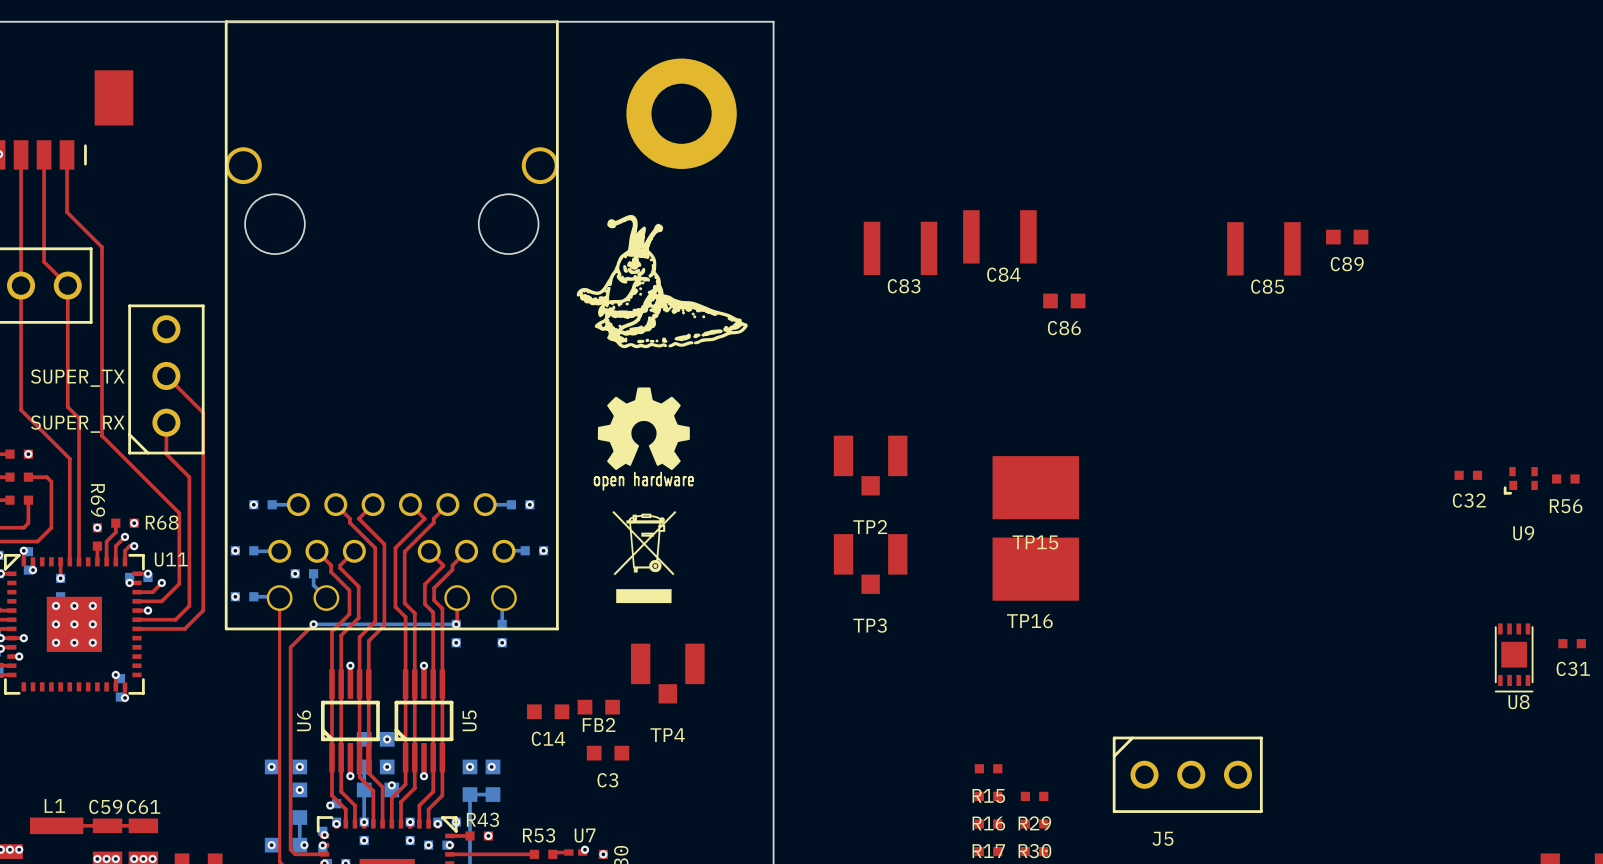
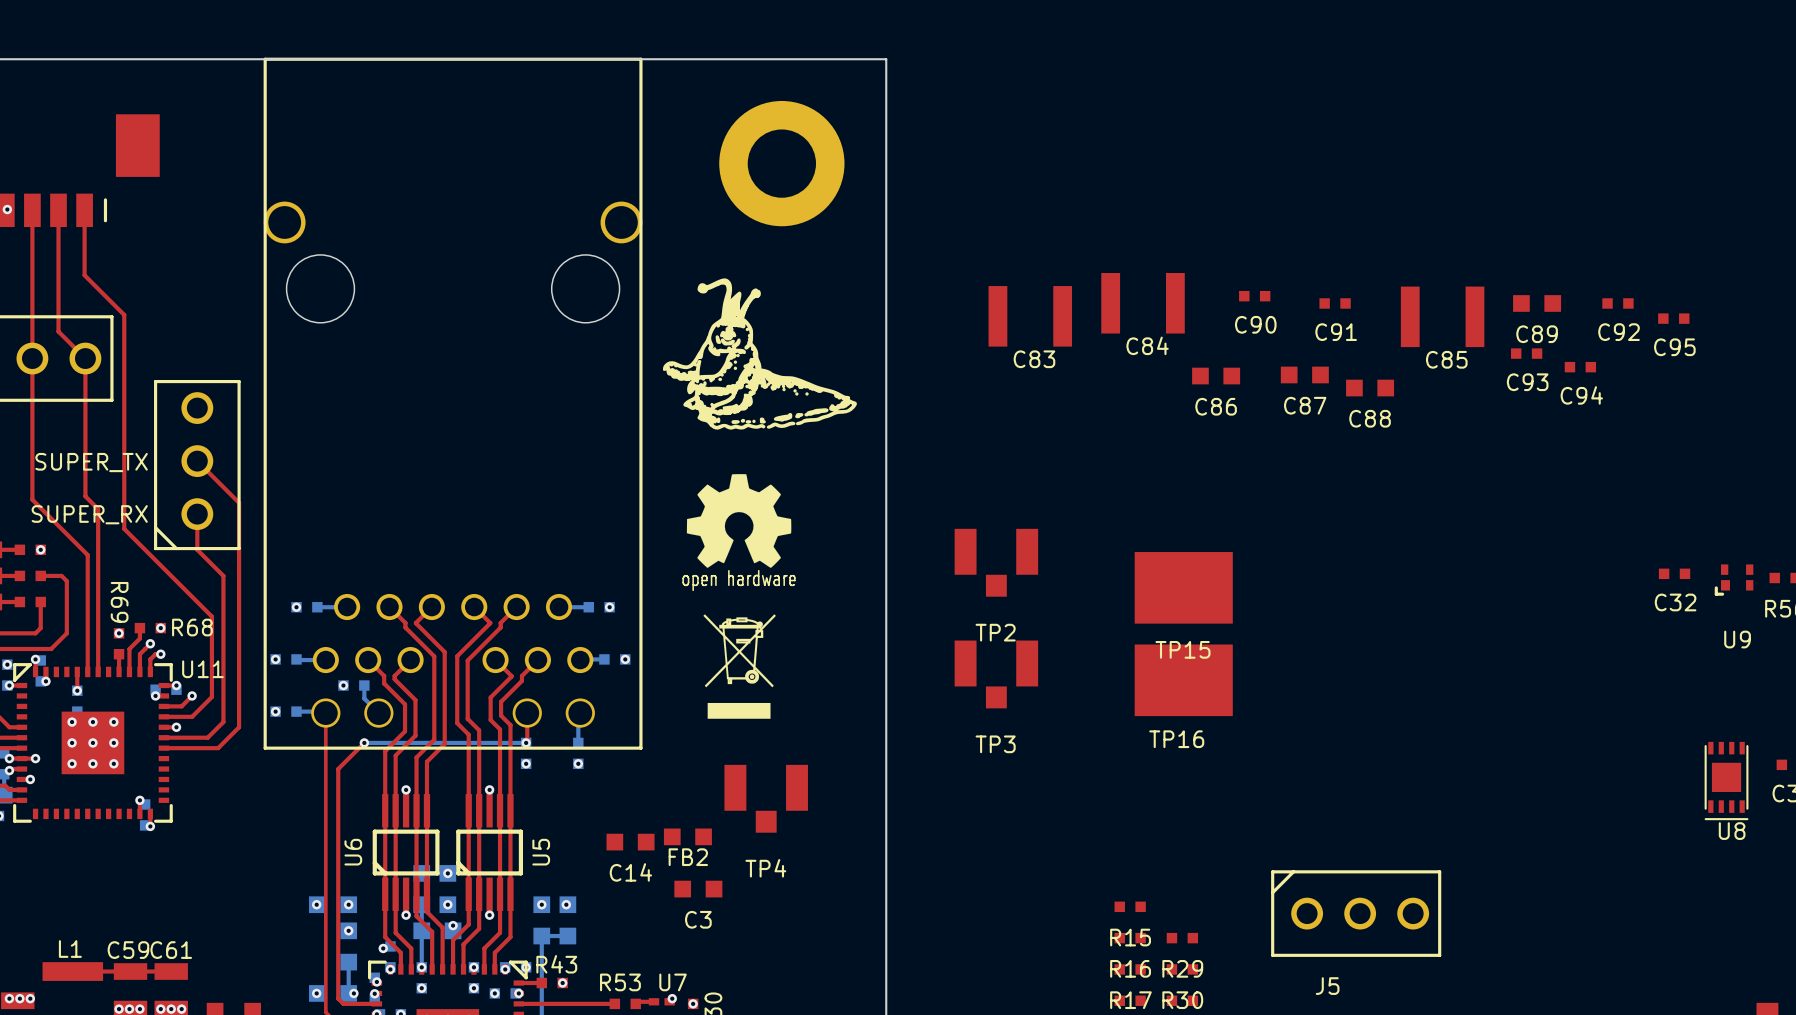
C90: none -> (1254, 296)
C91: none -> (1335, 303)
C92: none -> (1617, 303)
C95: none -> (1673, 318)
C93: none -> (1526, 353)
C94: none -> (1580, 367)
C87: none -> (1304, 374)
C88: none -> (1370, 388)

